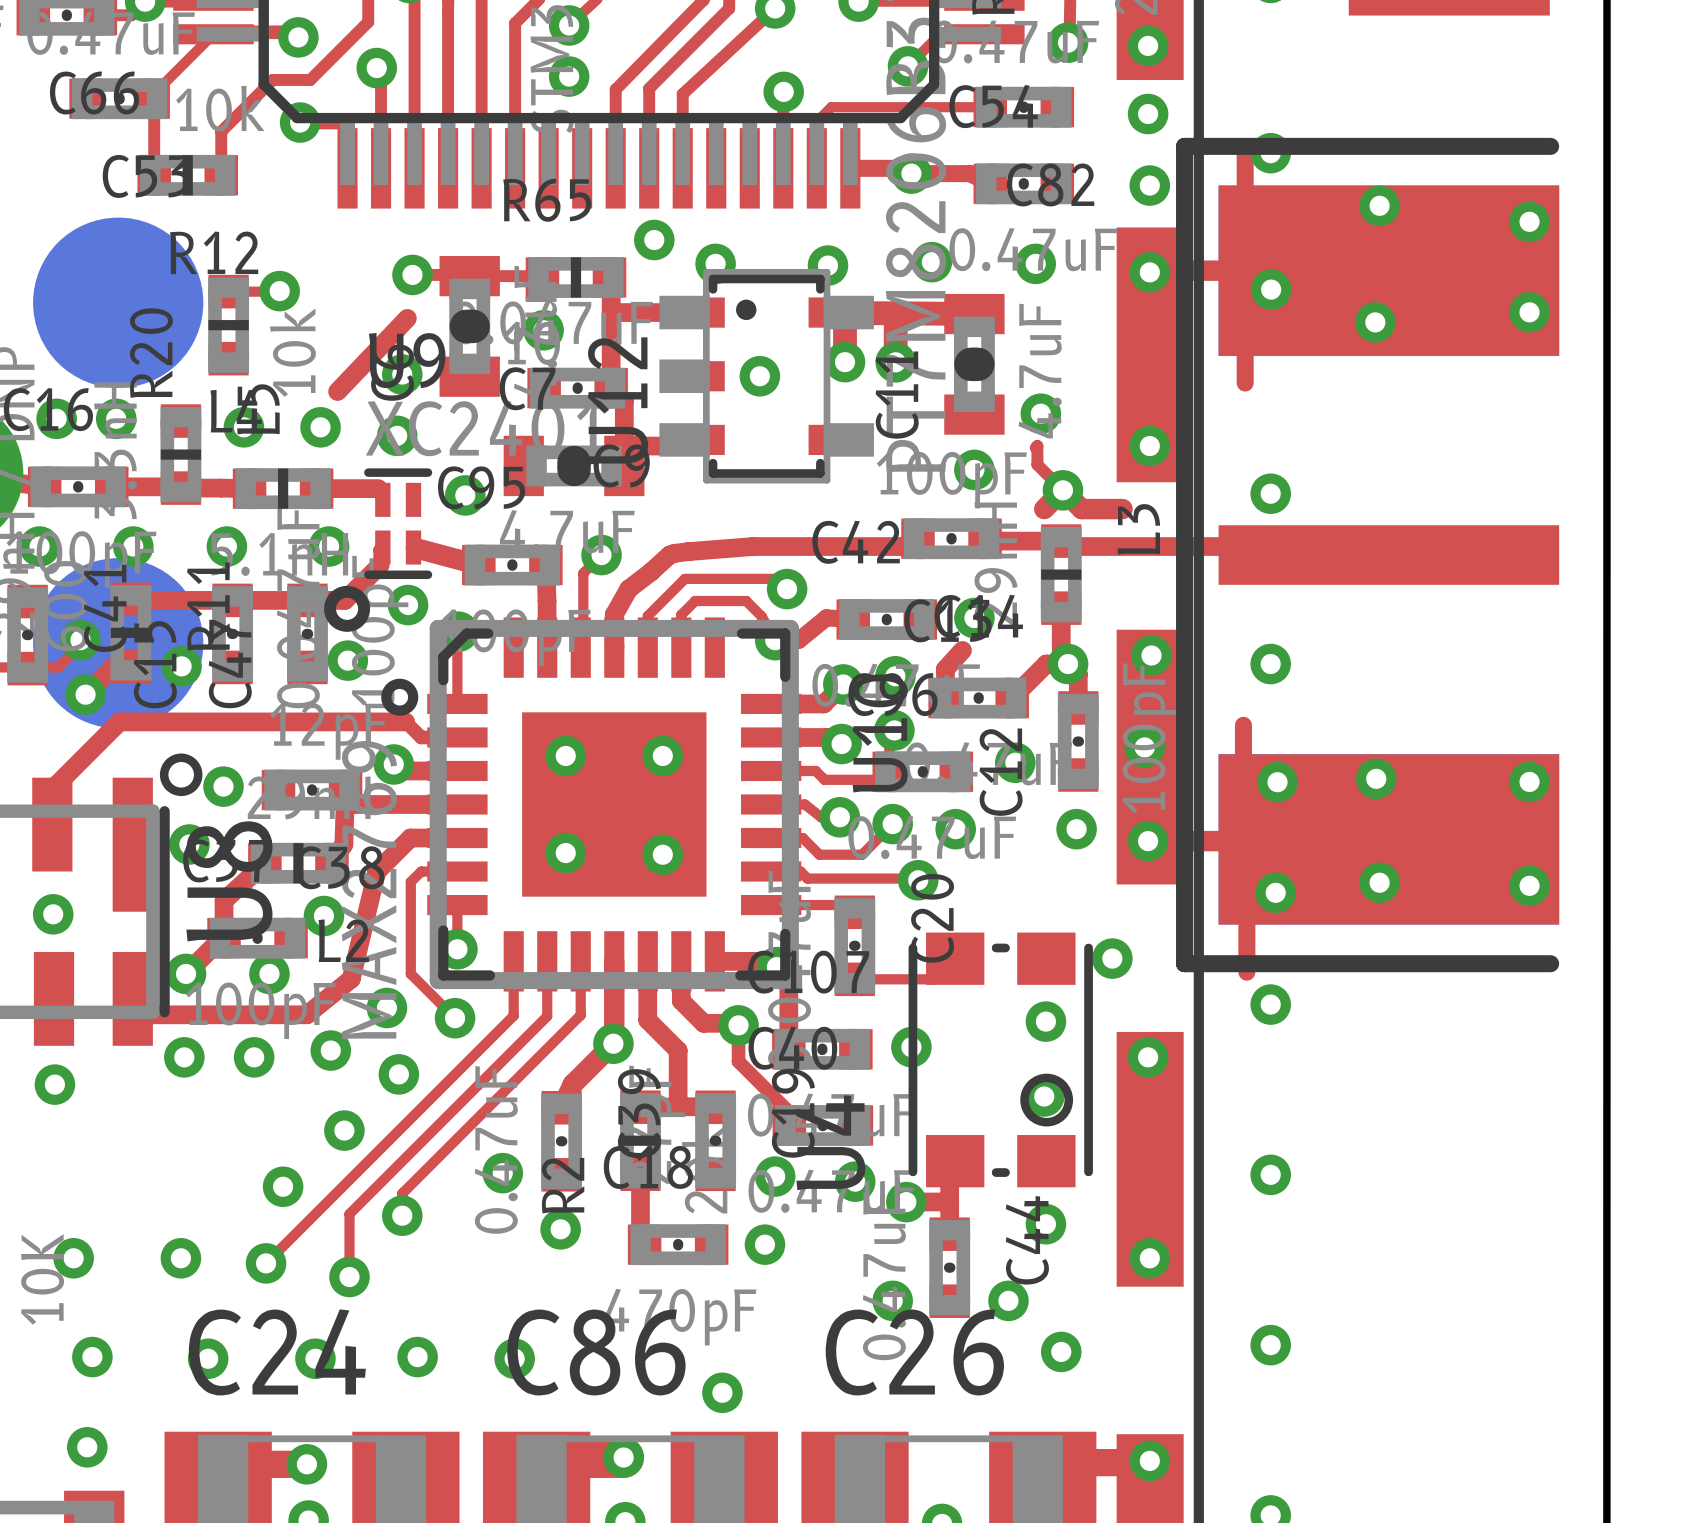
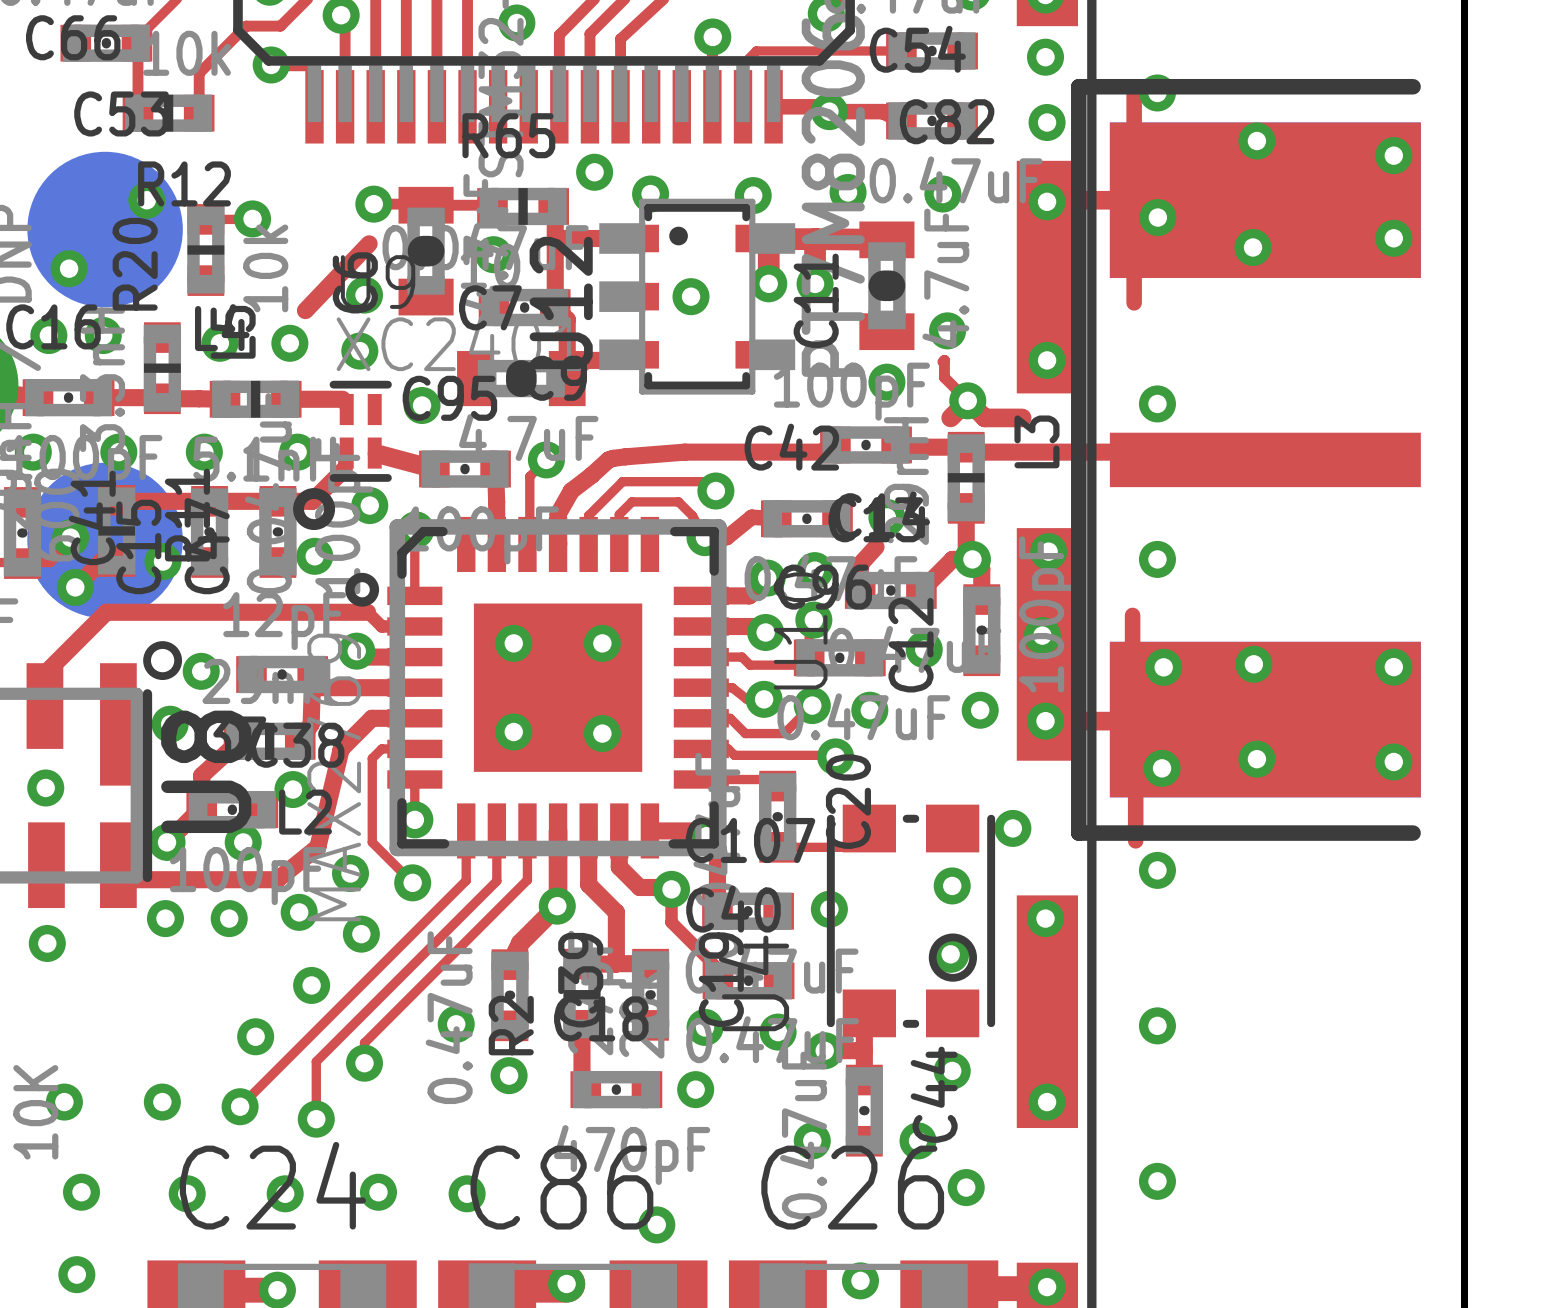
via: none -> (146, 200)
via: none -> (69, 268)
via: none -> (860, 1280)

